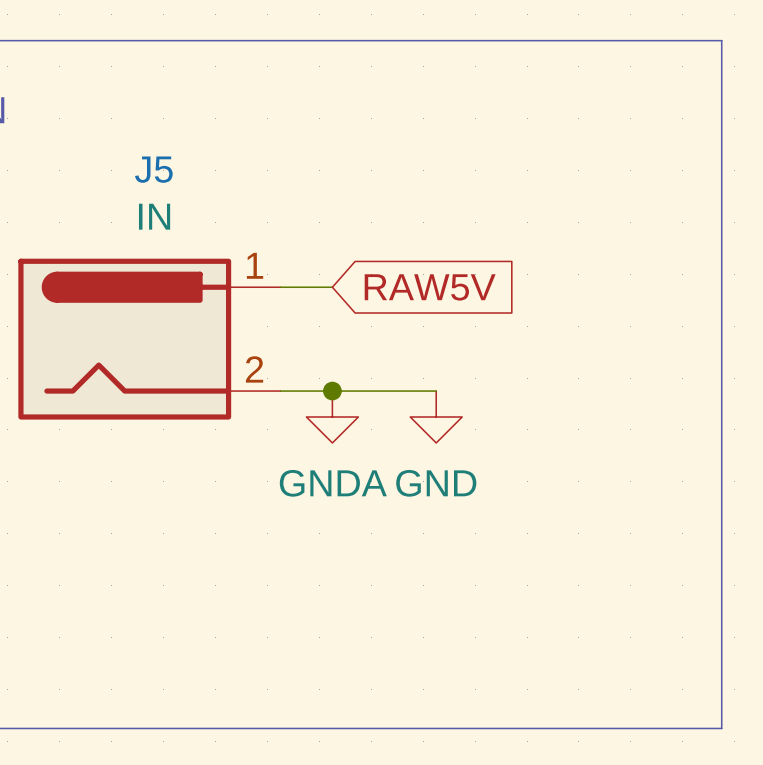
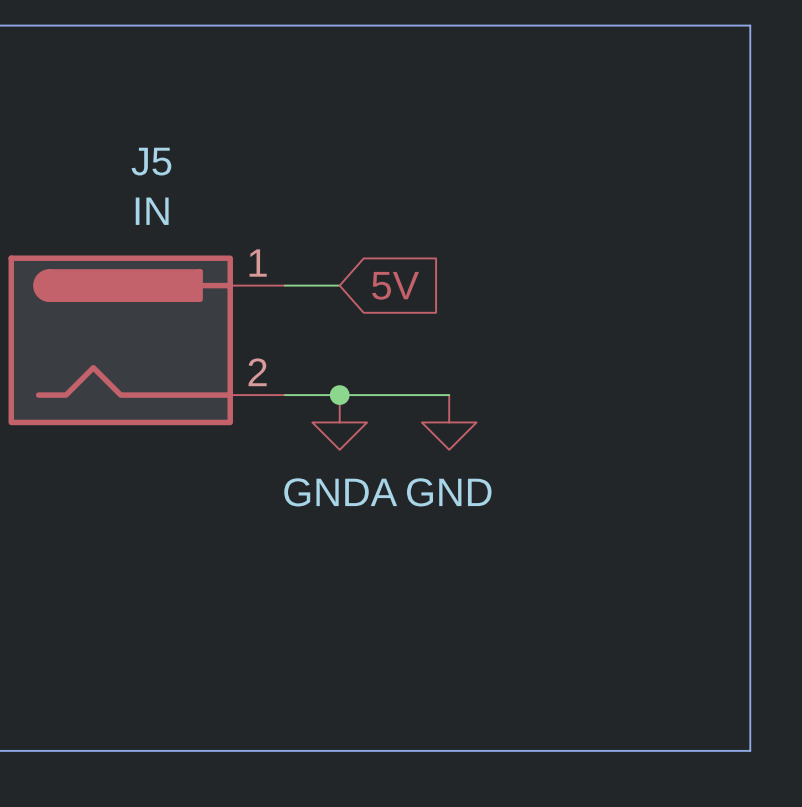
global label: RAW5V (430, 287) -> 5V (395, 285)

